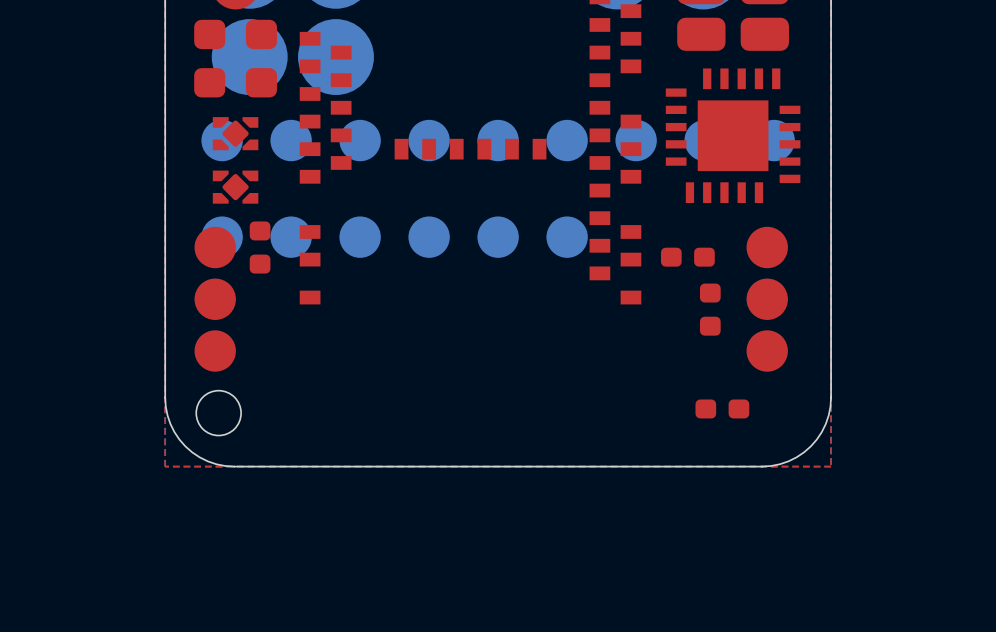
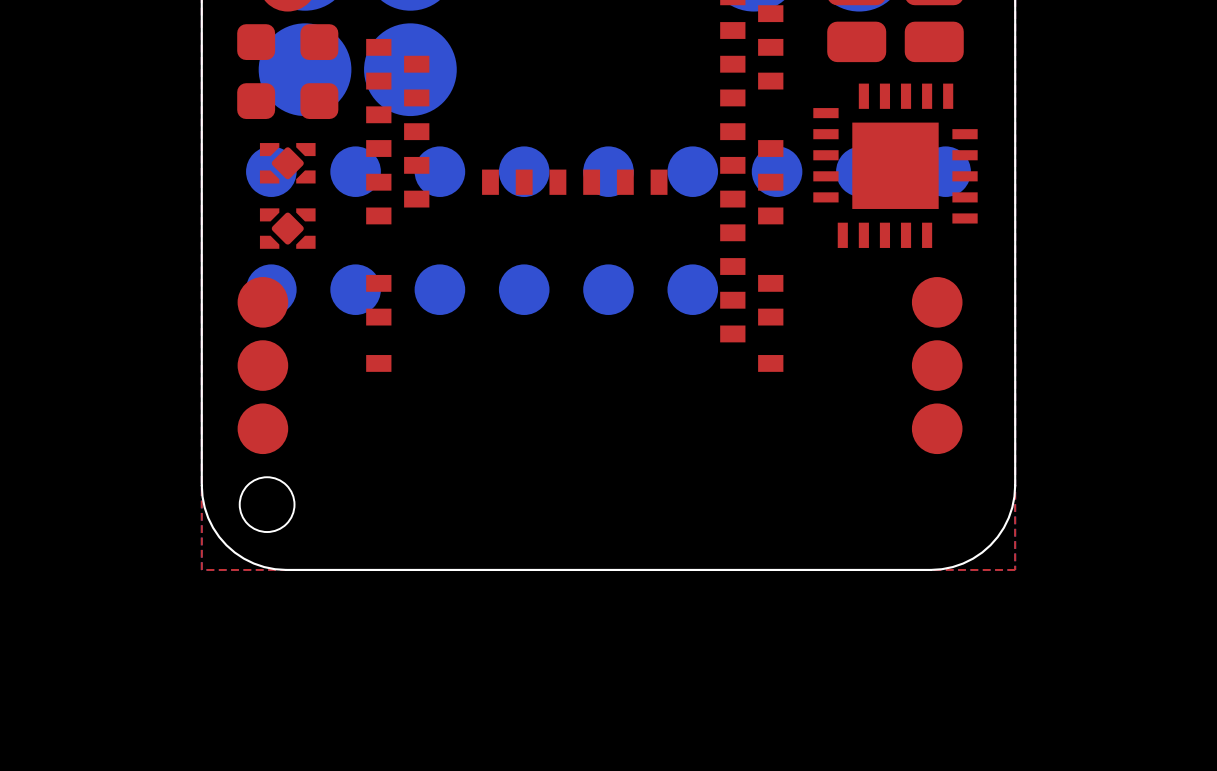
part: (260, 247) -> none
part: (687, 257) -> none
part: (710, 309) -> none
part: (722, 408) -> none

